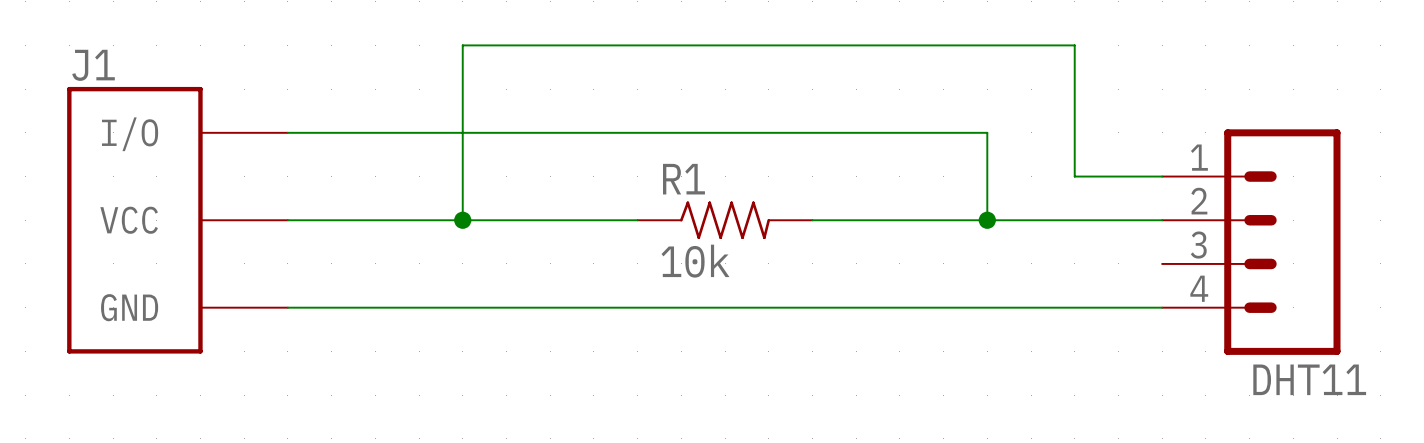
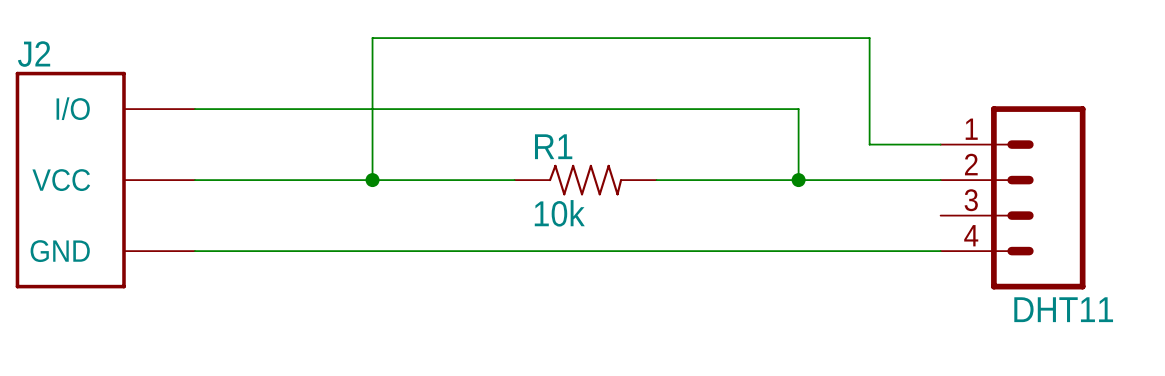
J2: none -> (105, 180)
J1: (177, 220) -> none

